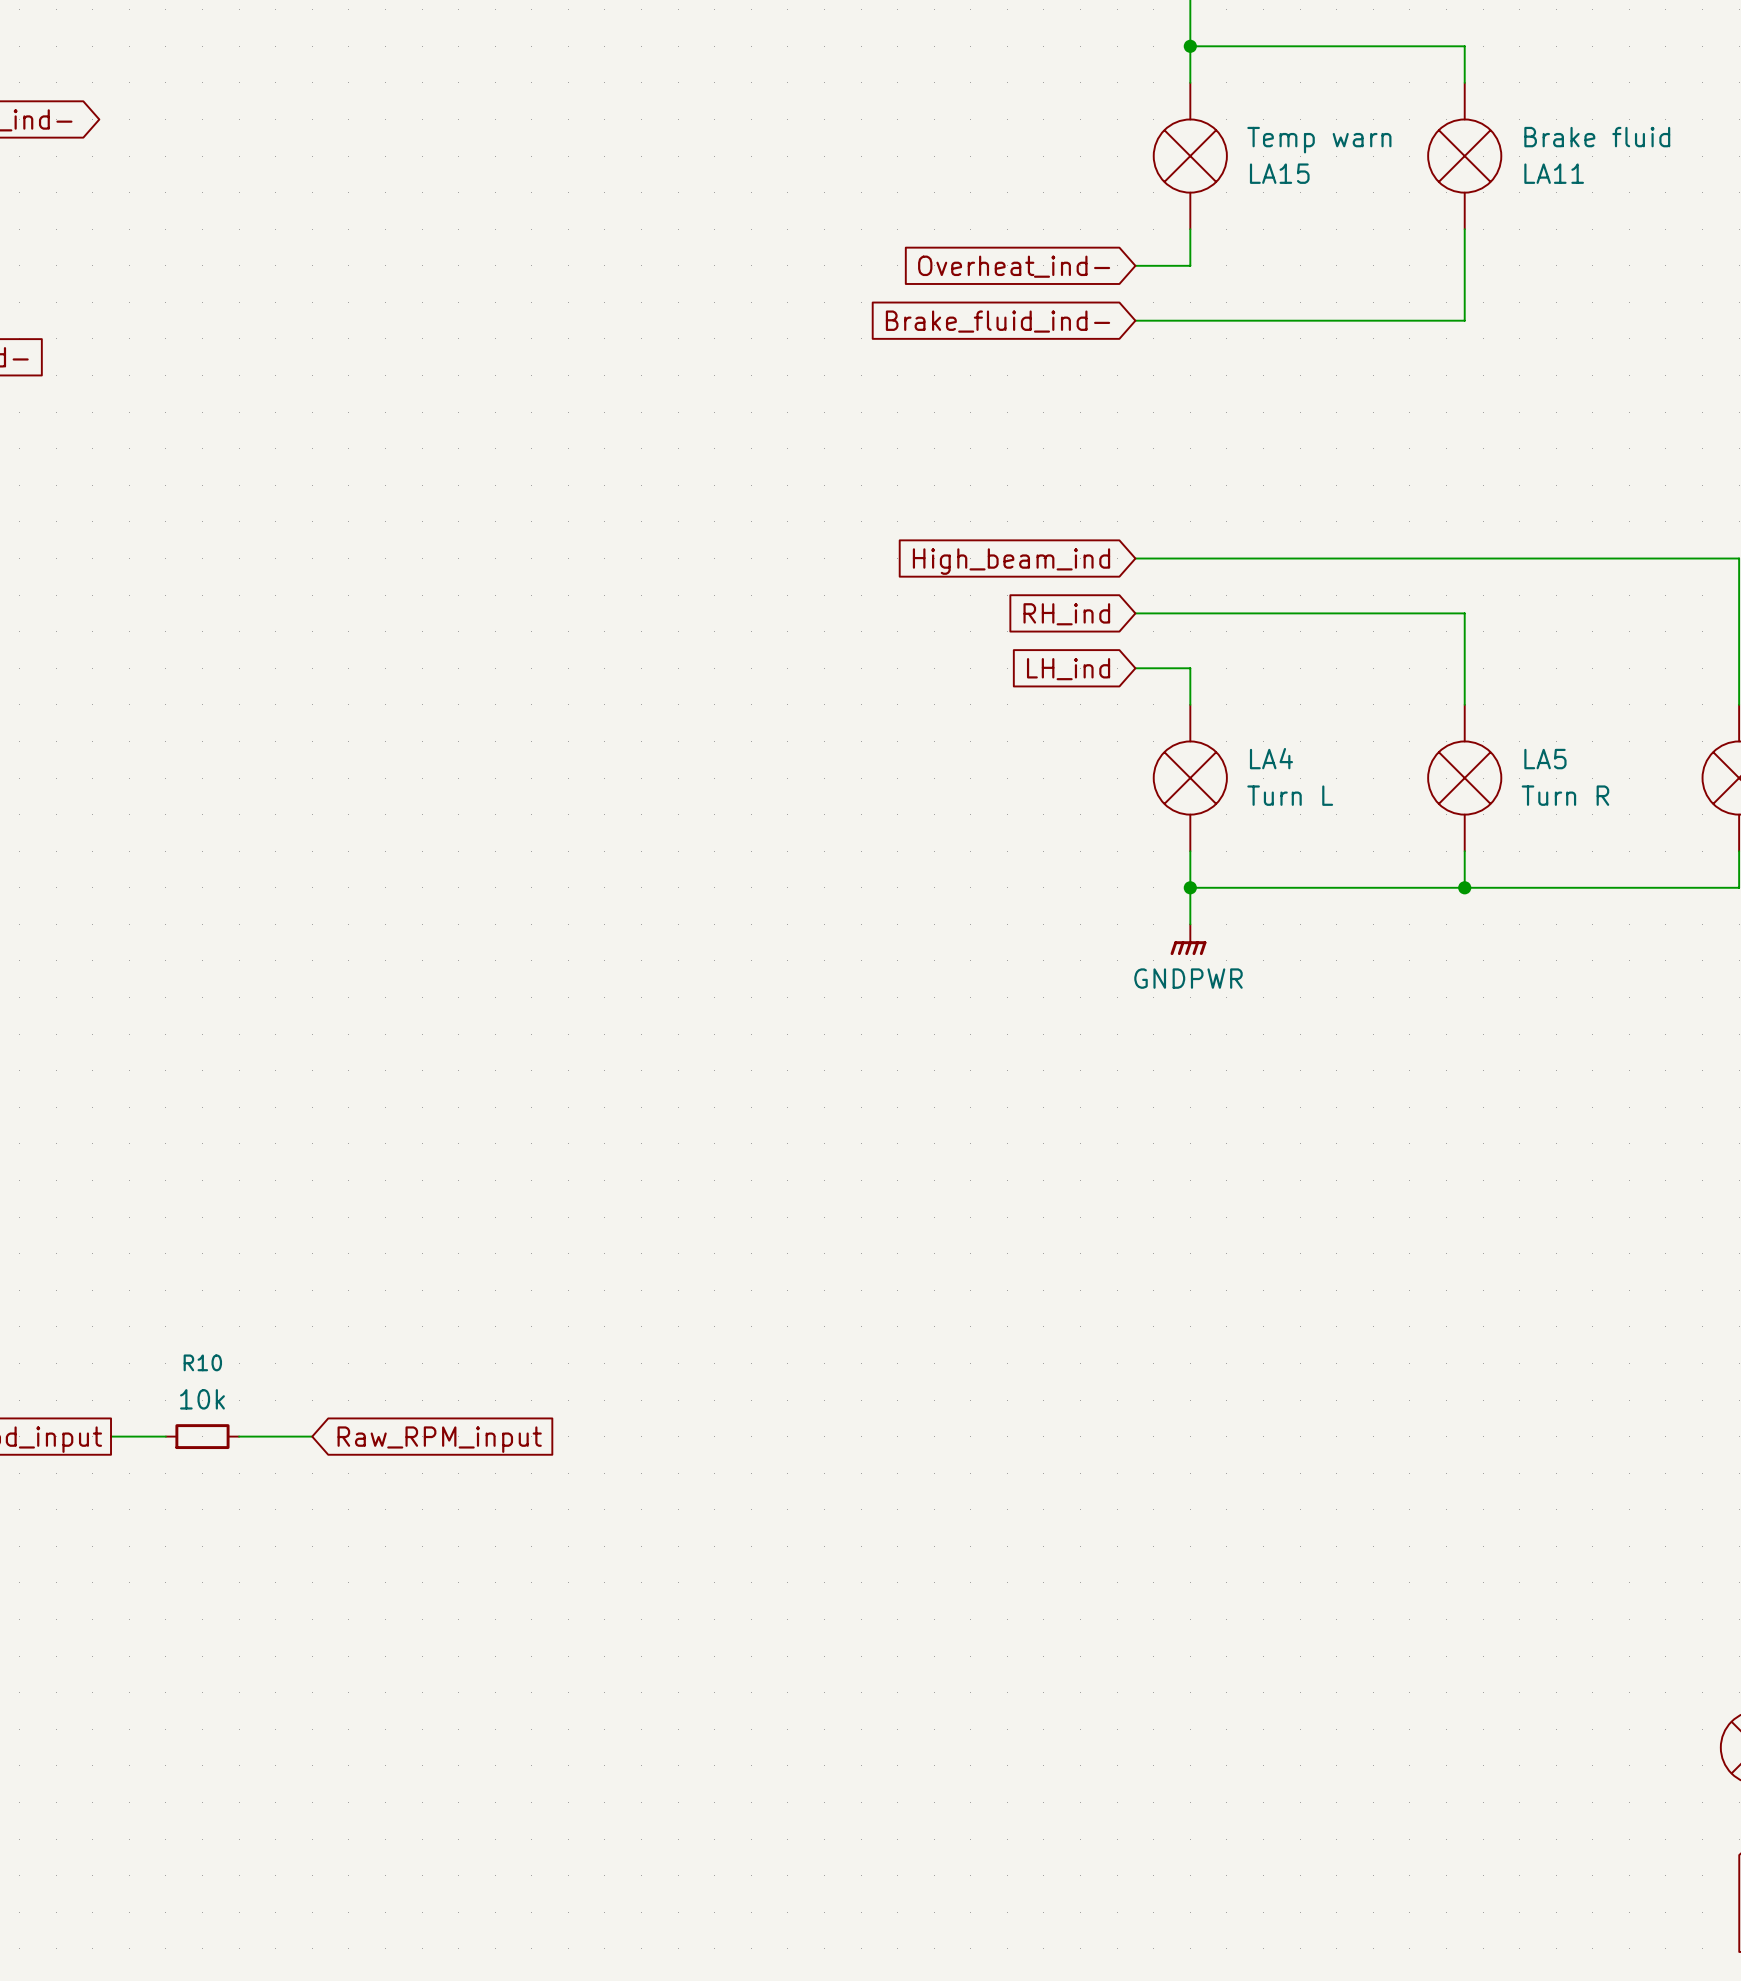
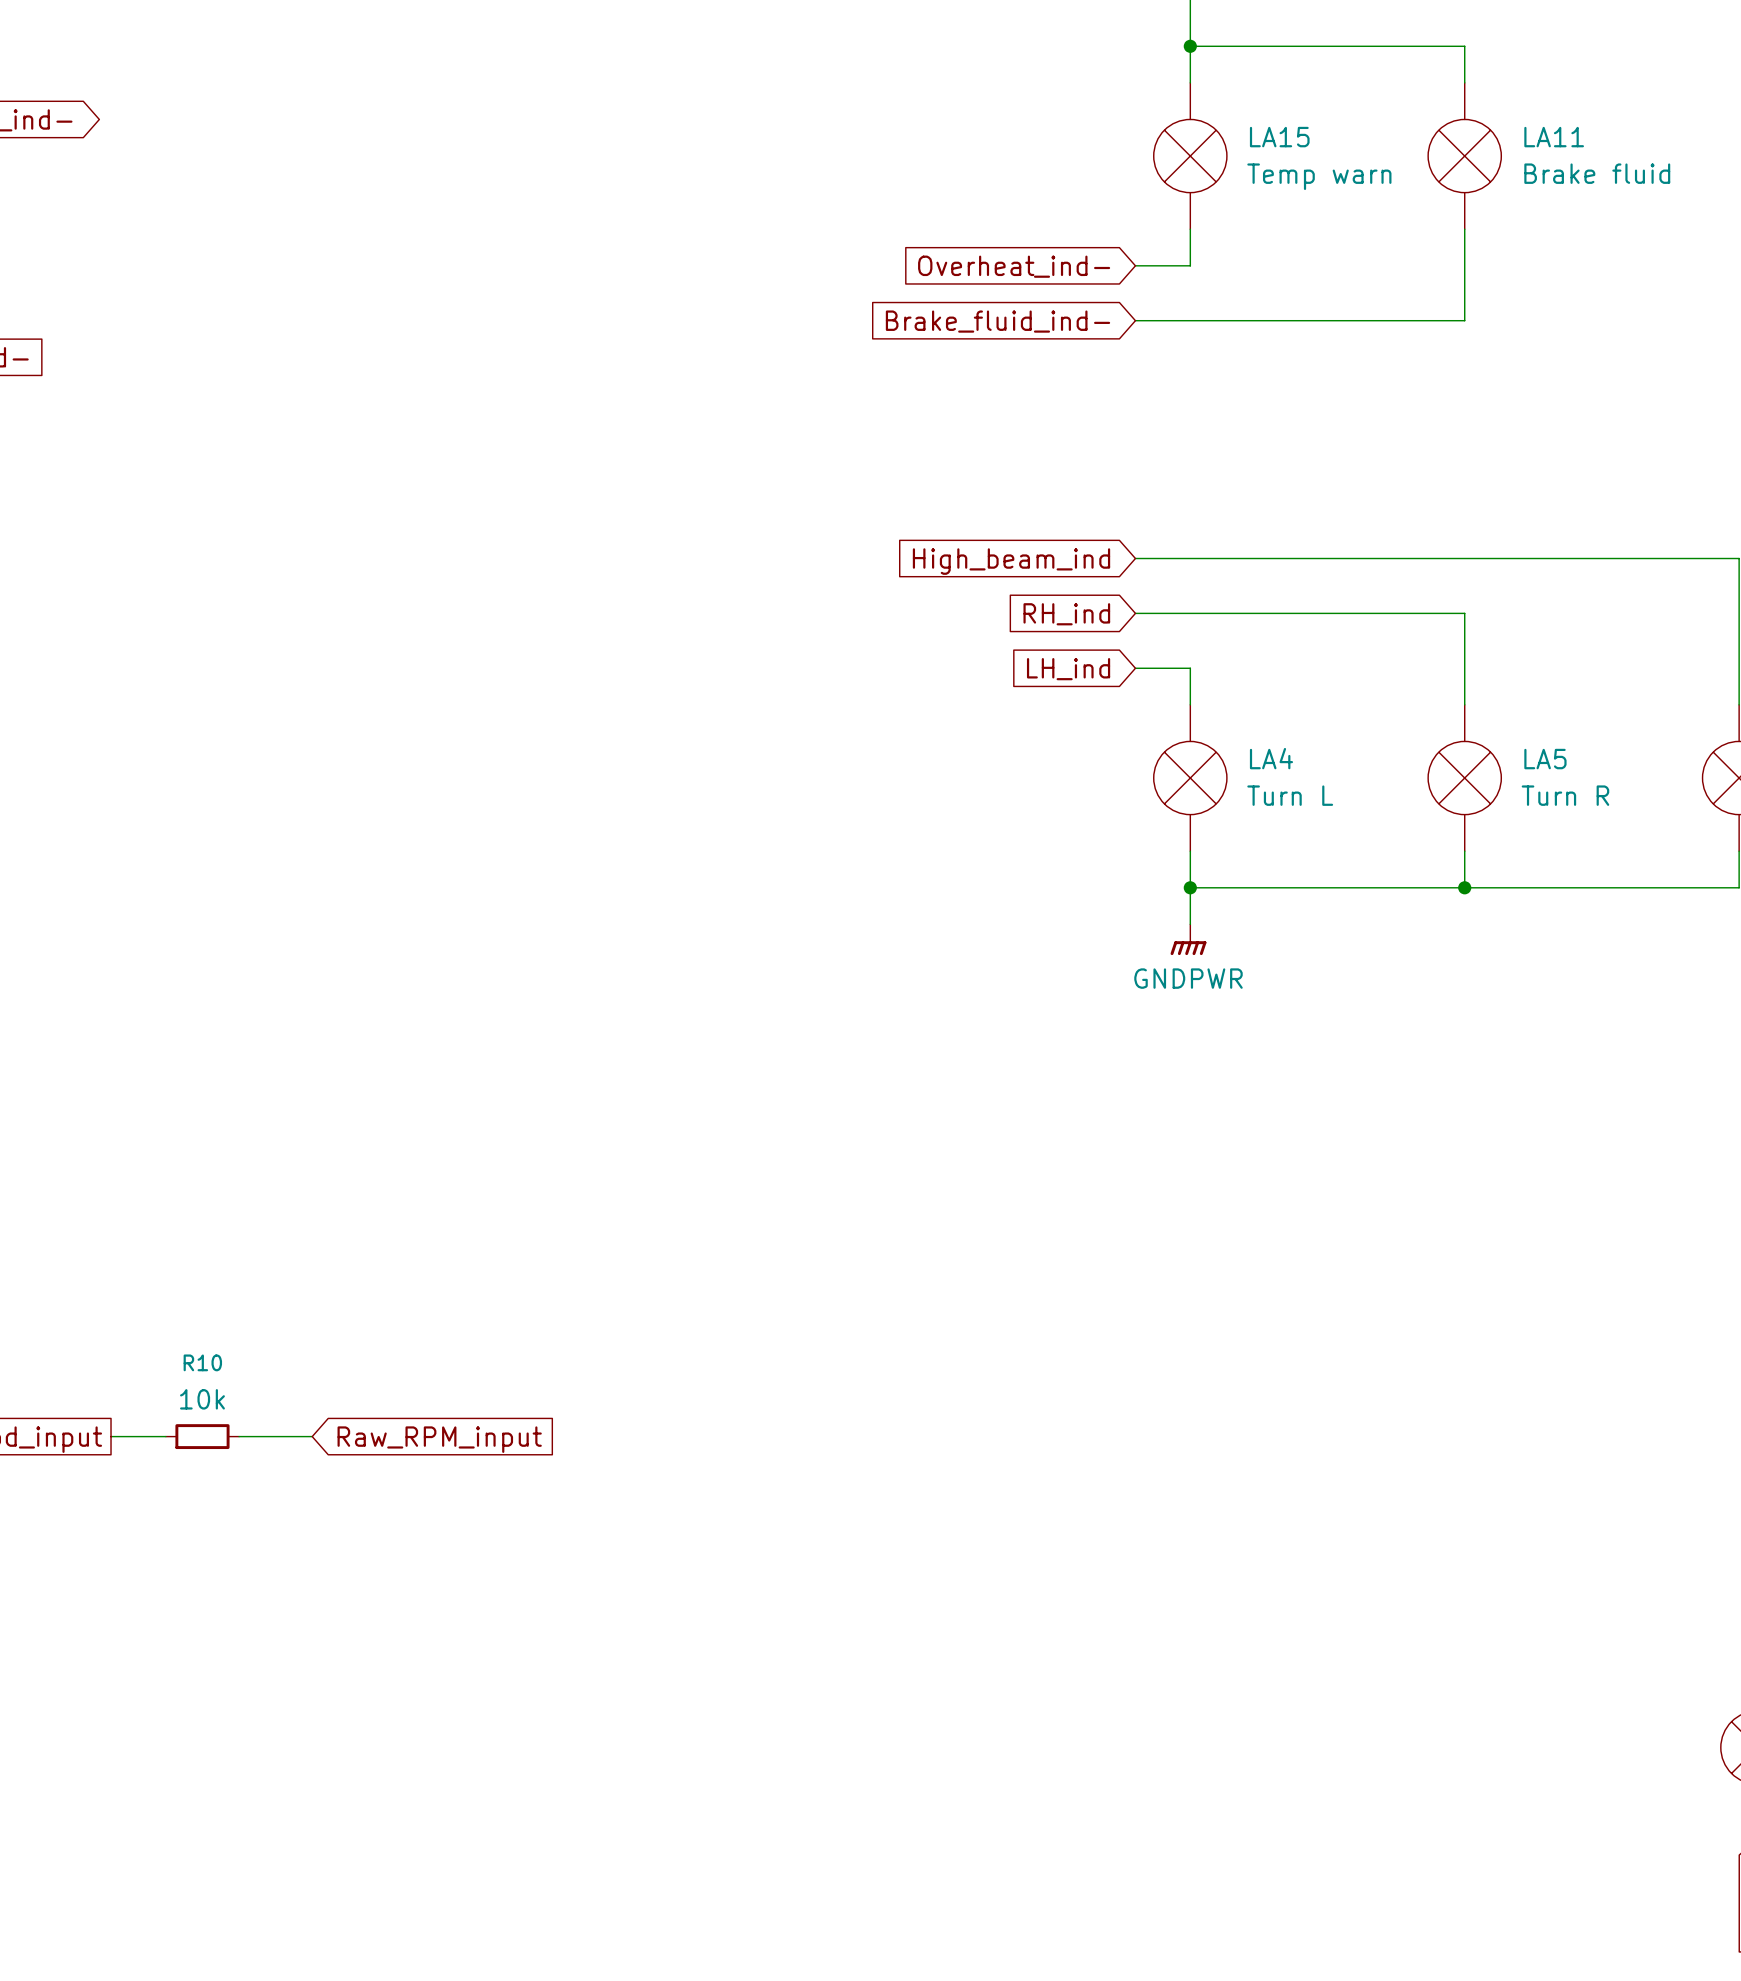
LA11 value position: Brake fluid (1597, 137) -> Brake fluid (1597, 173)
LA15 value position: Temp warn (1319, 140) -> Temp warn (1319, 176)
LA15 name position: LA15 (1279, 173) -> LA15 (1279, 137)
LA11 name position: LA11 (1554, 173) -> LA11 (1554, 137)

